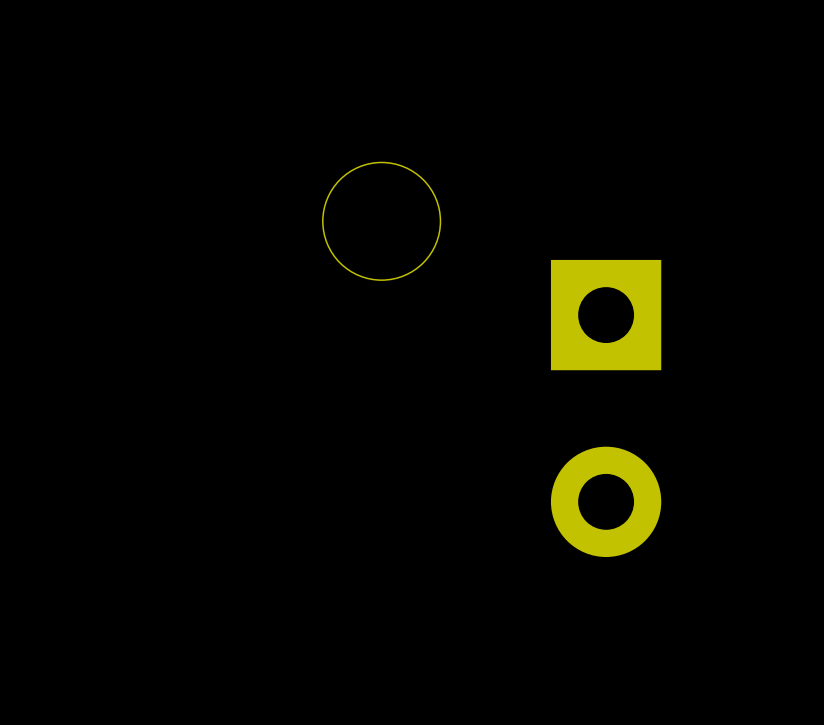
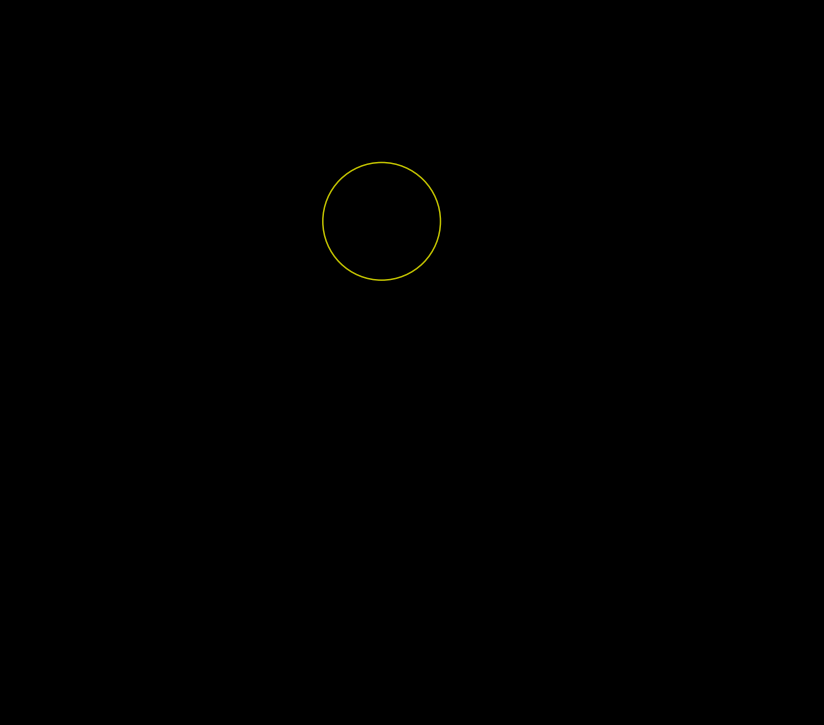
part: (606, 408) -> none

